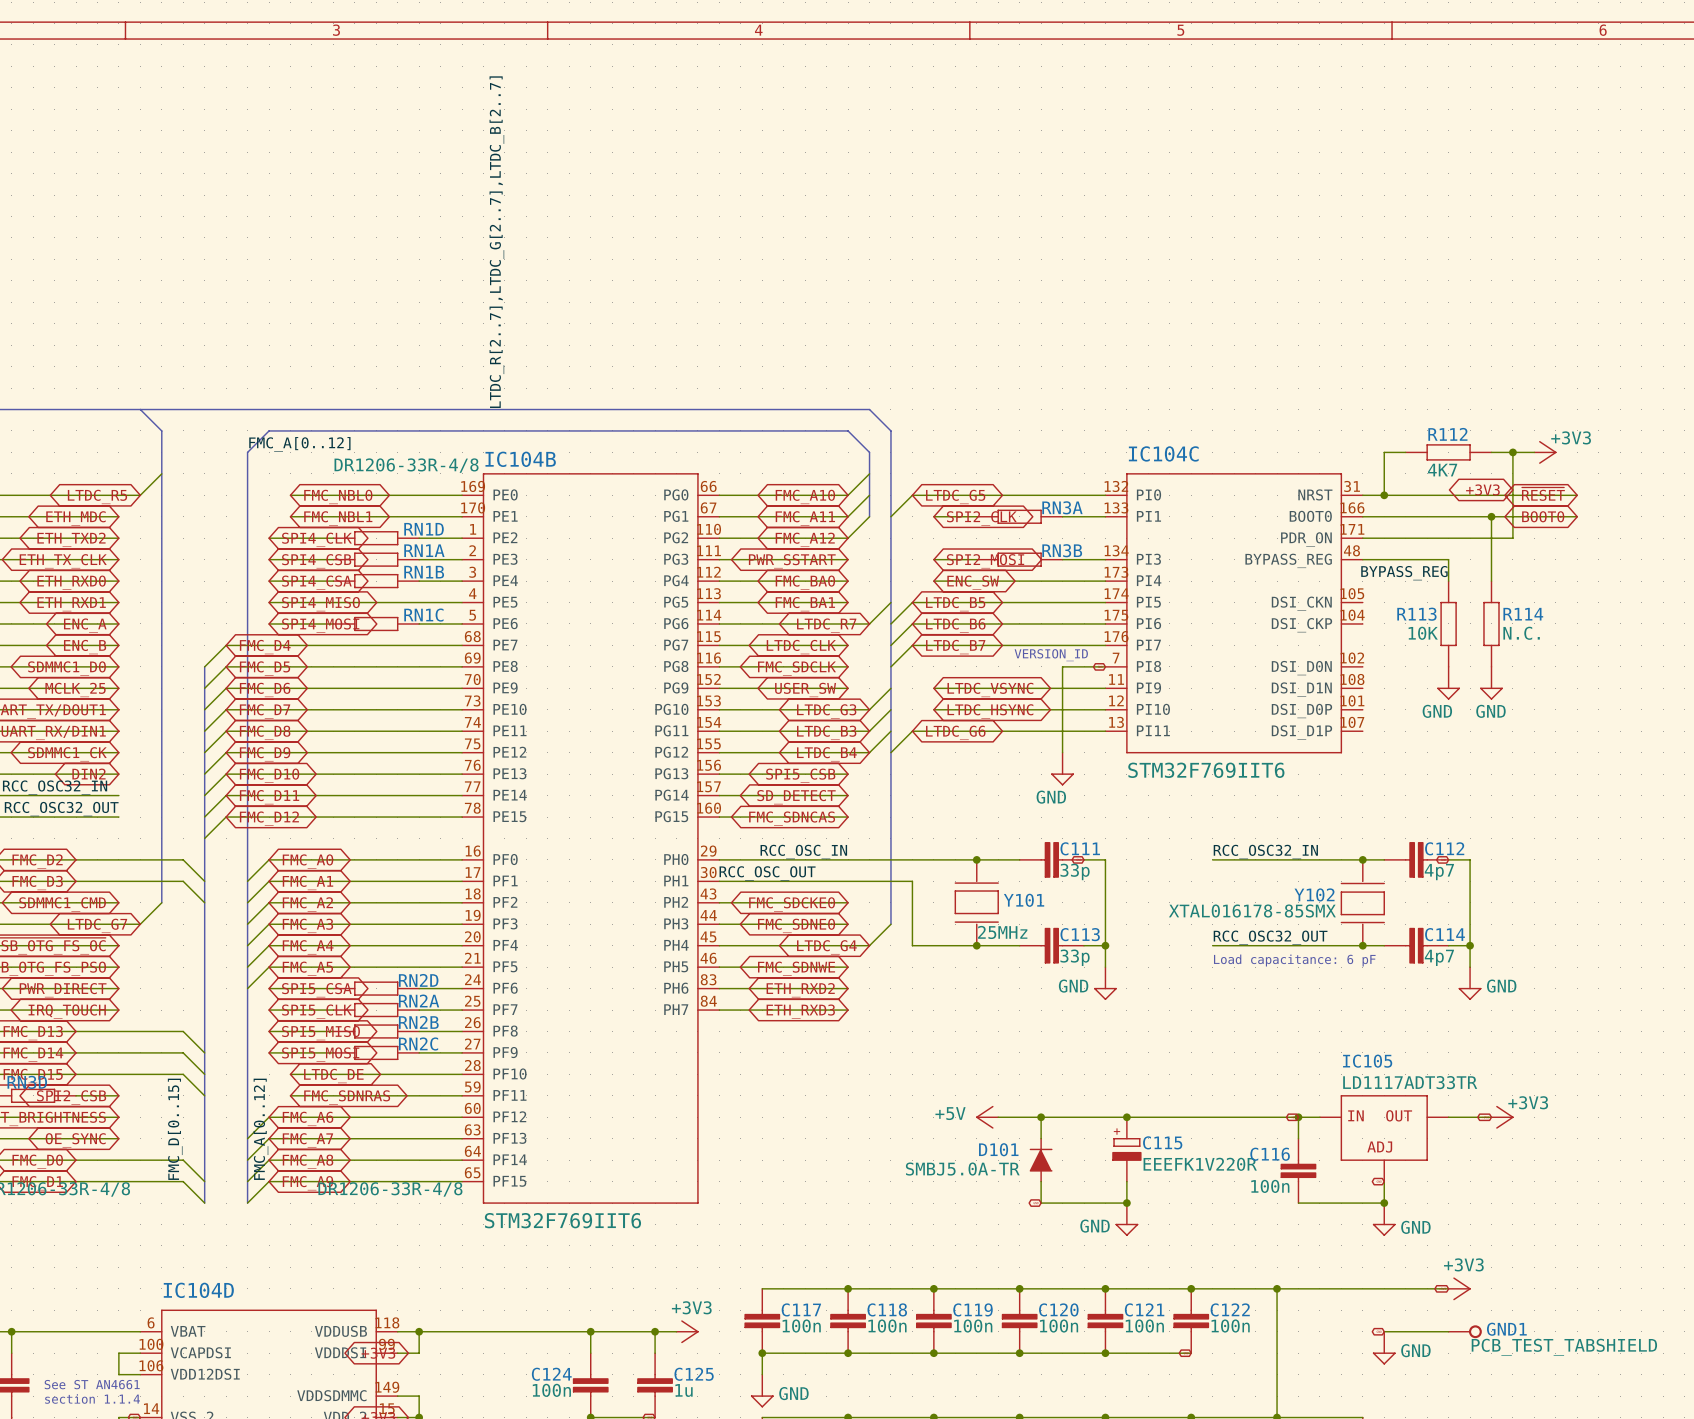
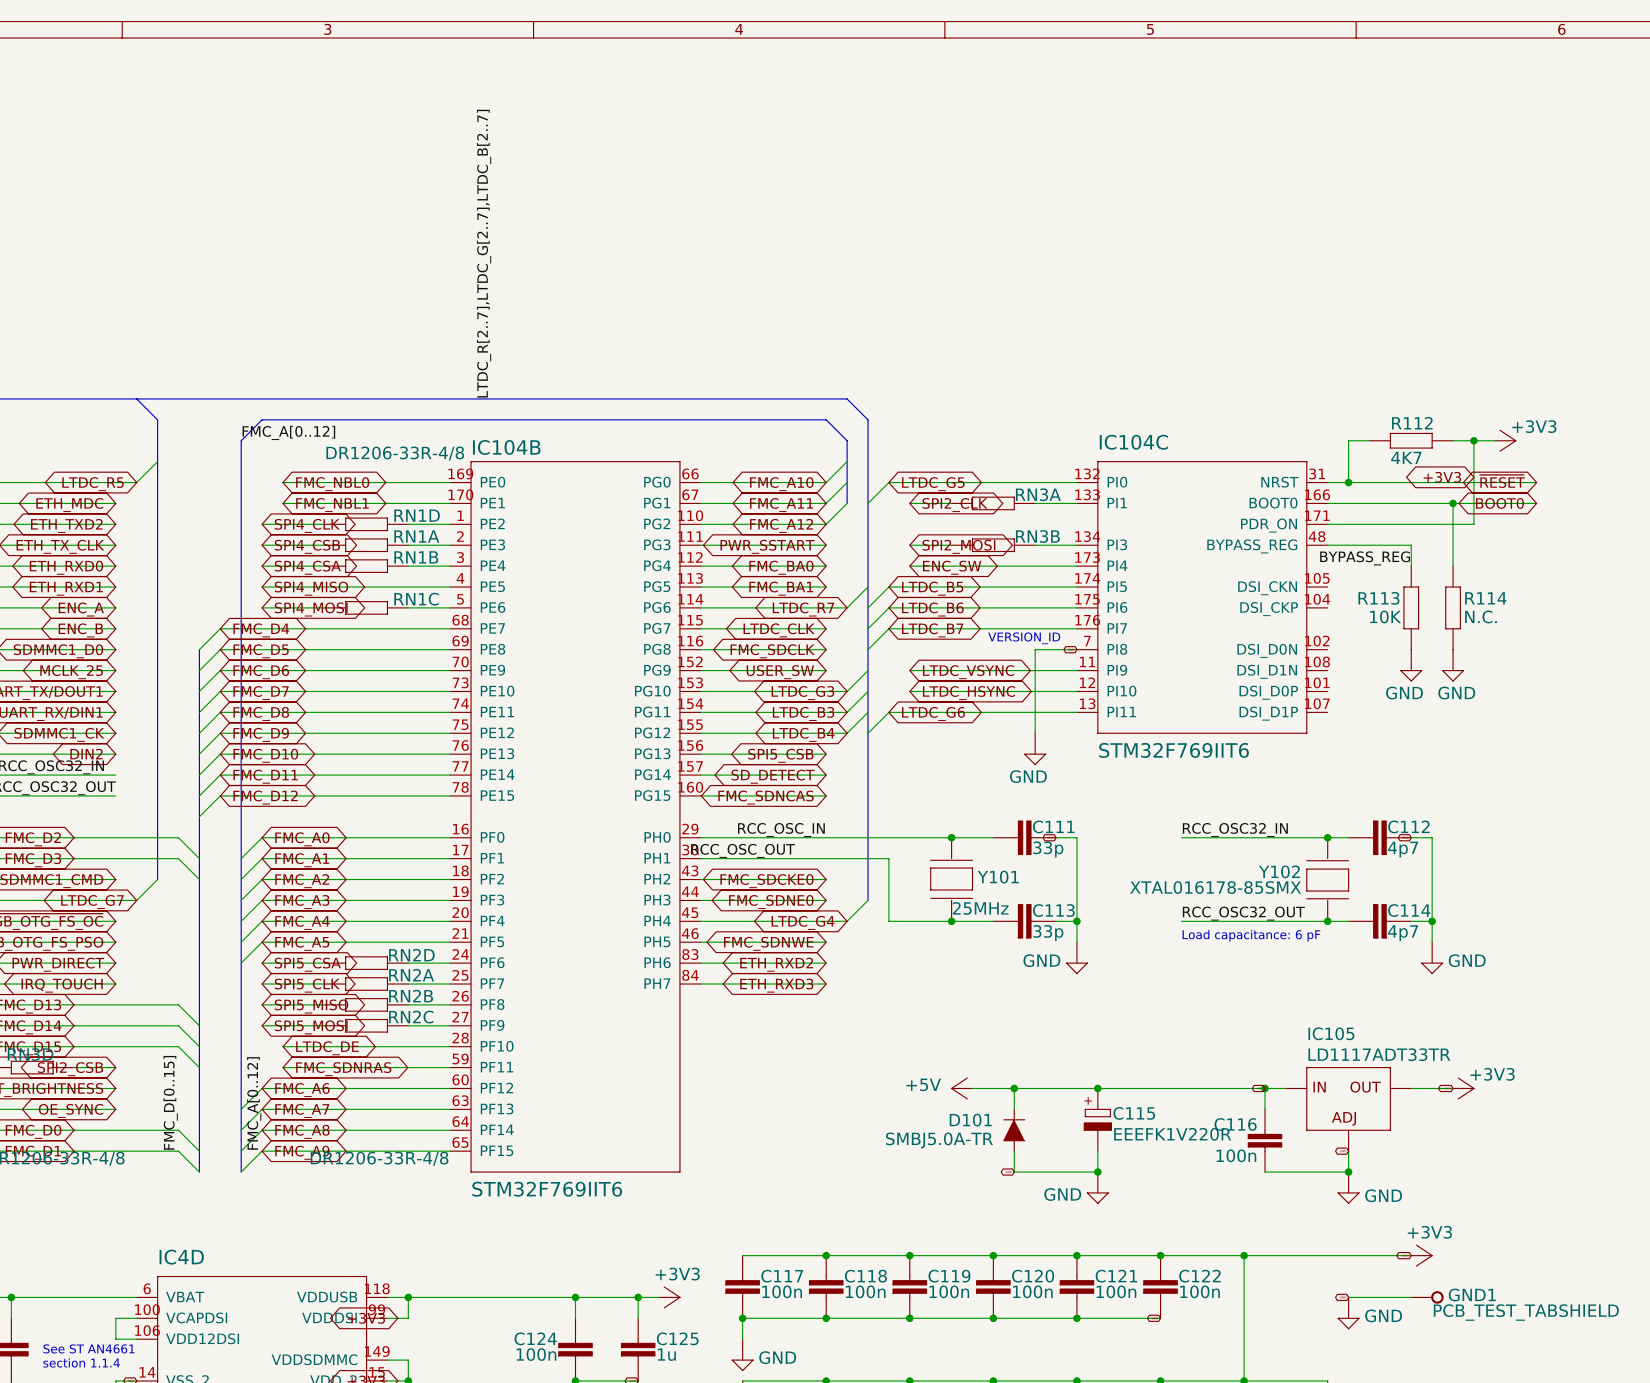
IC104D name: IC104D (198, 1290) -> IC4D (181, 1257)

